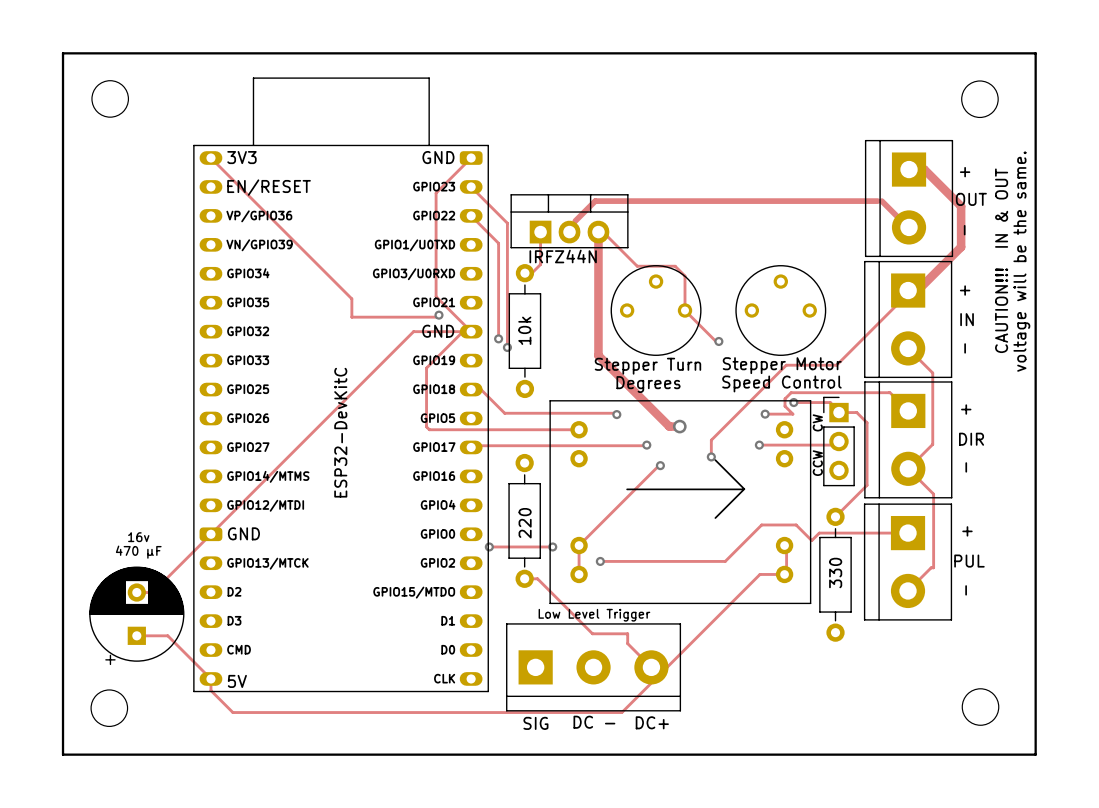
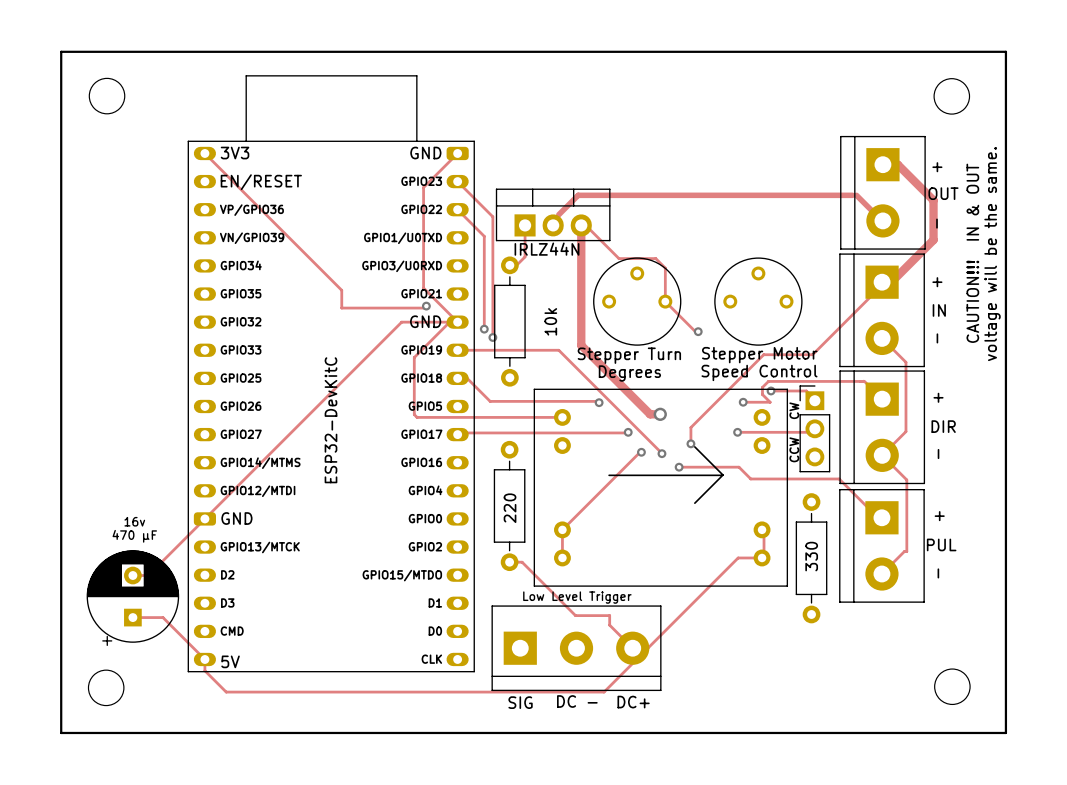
part value: IRFZ44N (563, 256) -> IRLZ44N (546, 249)
part value position: 10k (524, 330) -> 10k (550, 321)
track: none -> (457, 350) (558, 350) (661, 453)
track: (838, 412) (856, 412) (867, 422) (867, 485) (835, 516) -> none
via: none -> (661, 453)
track: none -> (679, 467) (738, 467) (750, 478) (839, 478) (878, 517)
via: none -> (679, 467)
track: (908, 533) (819, 533) (811, 540) (796, 524) (761, 524) (725, 561) (600, 561) -> none
track: (489, 546) (552, 546) -> none
via: (489, 546) -> none
via: (552, 546) -> none
via: (600, 561) -> none

